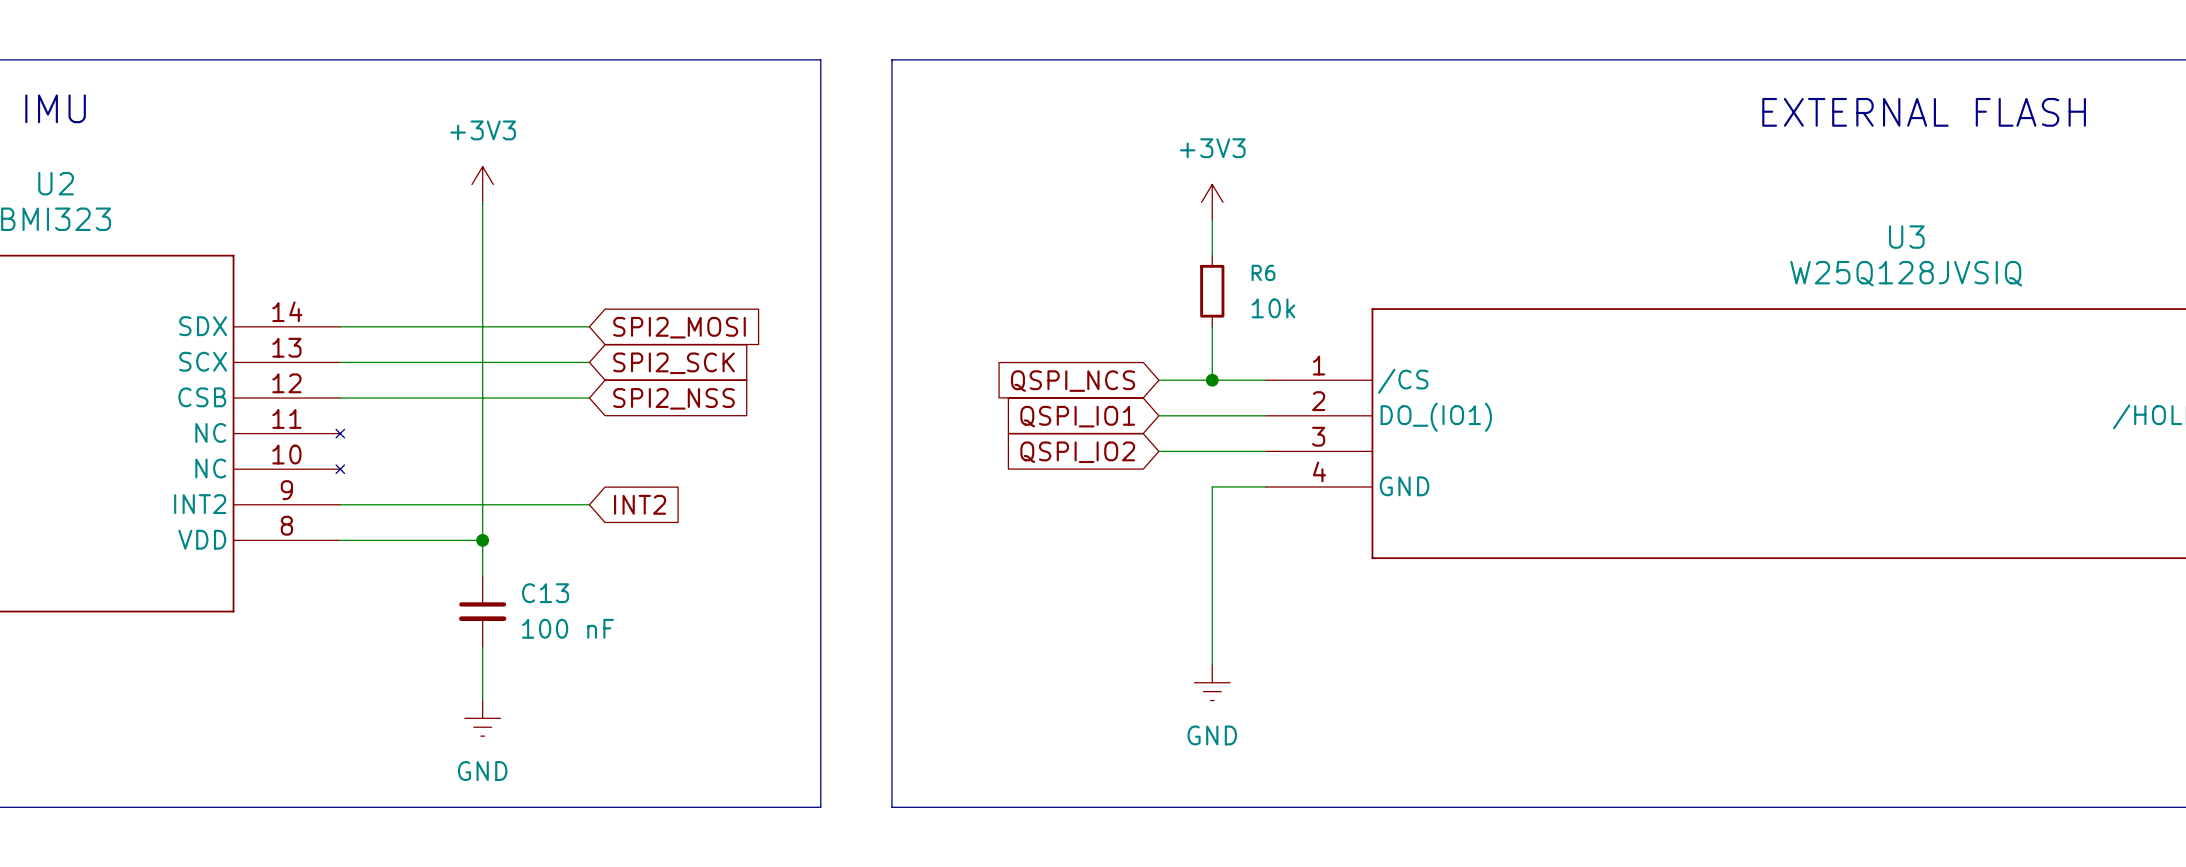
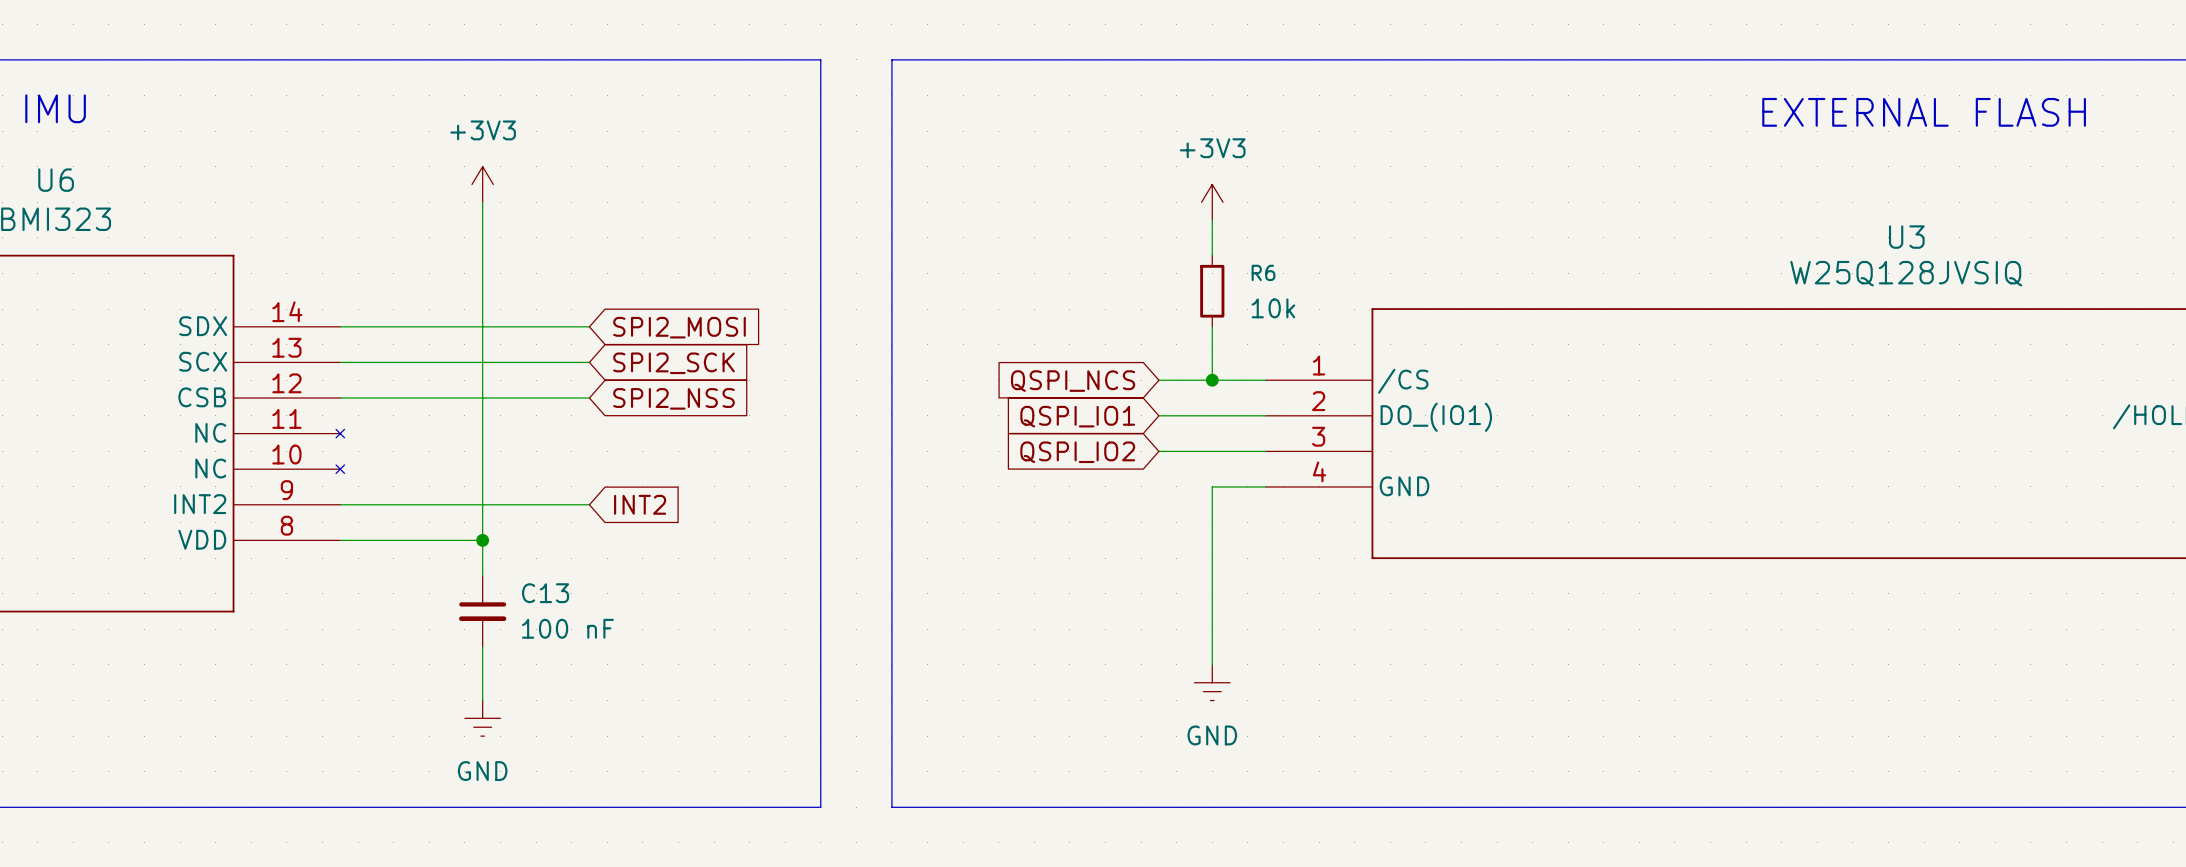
U2 name: U2 (56, 183) -> U6 (56, 180)

